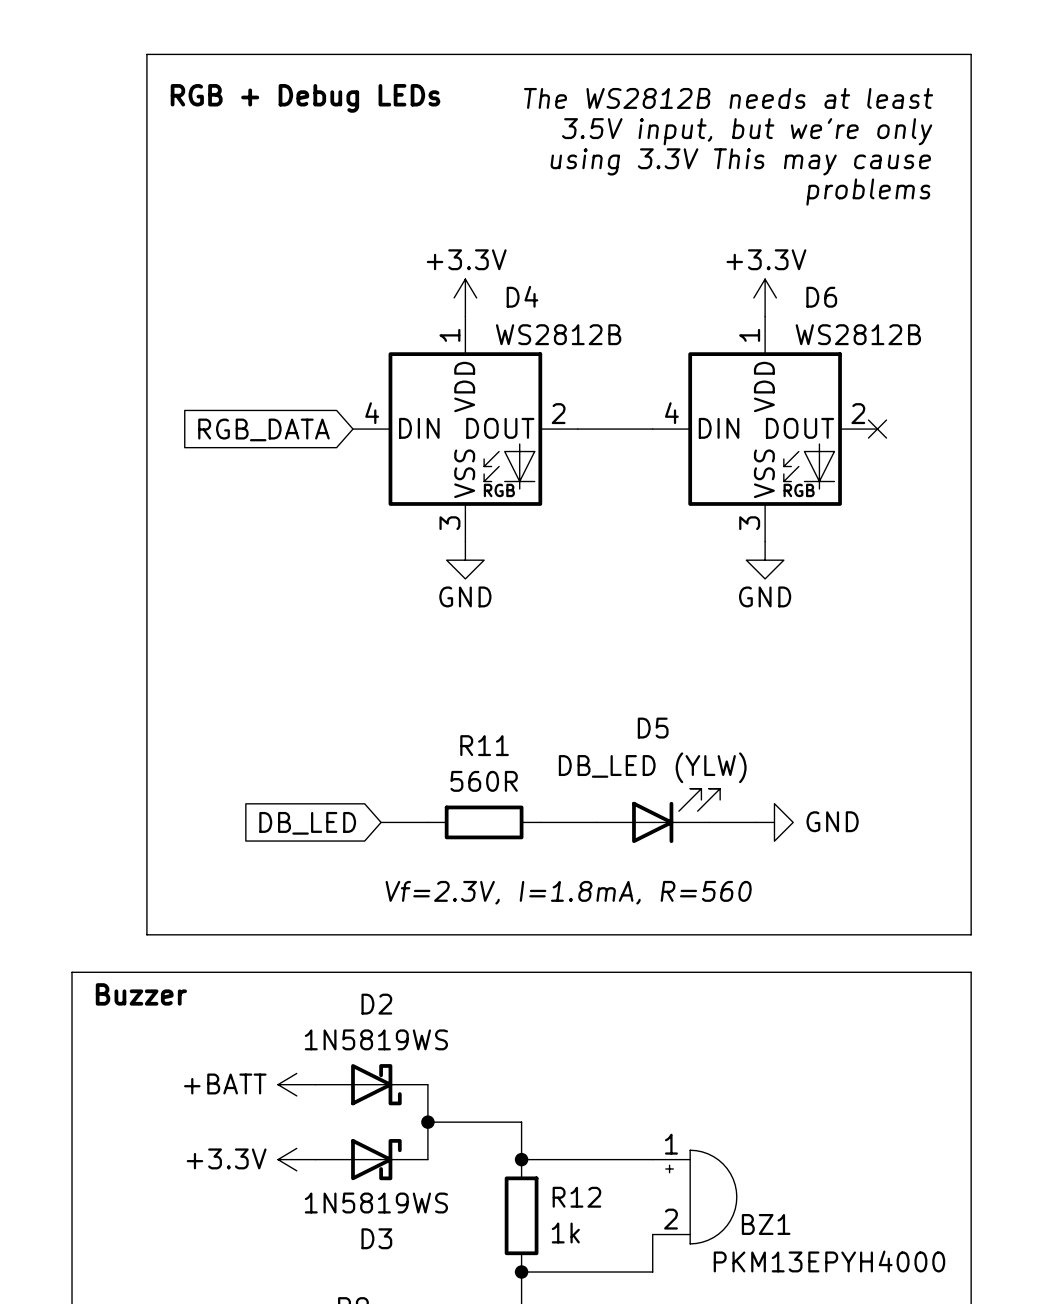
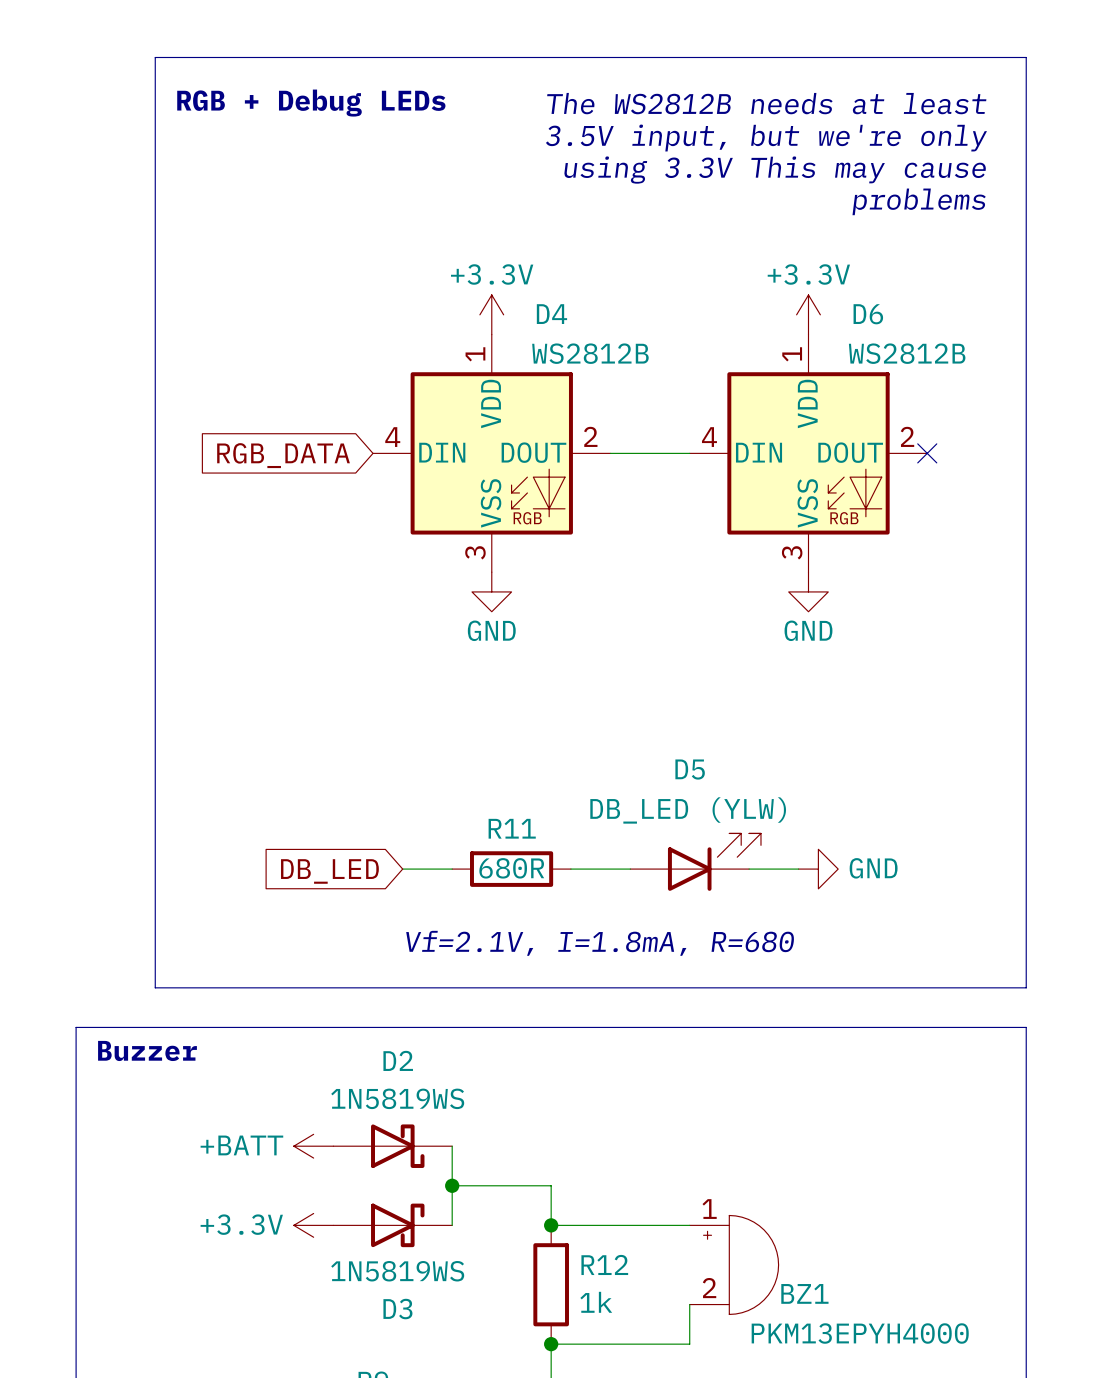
R11 name position: R11 (484, 745) -> R11 (512, 828)
R11 value: 560R (484, 781) -> 680R (511, 868)
text: Vf=2.3V, I=1.8mA, R=560 (568, 892) -> Vf=2.1V, I=1.8mA, R=680 (600, 943)

